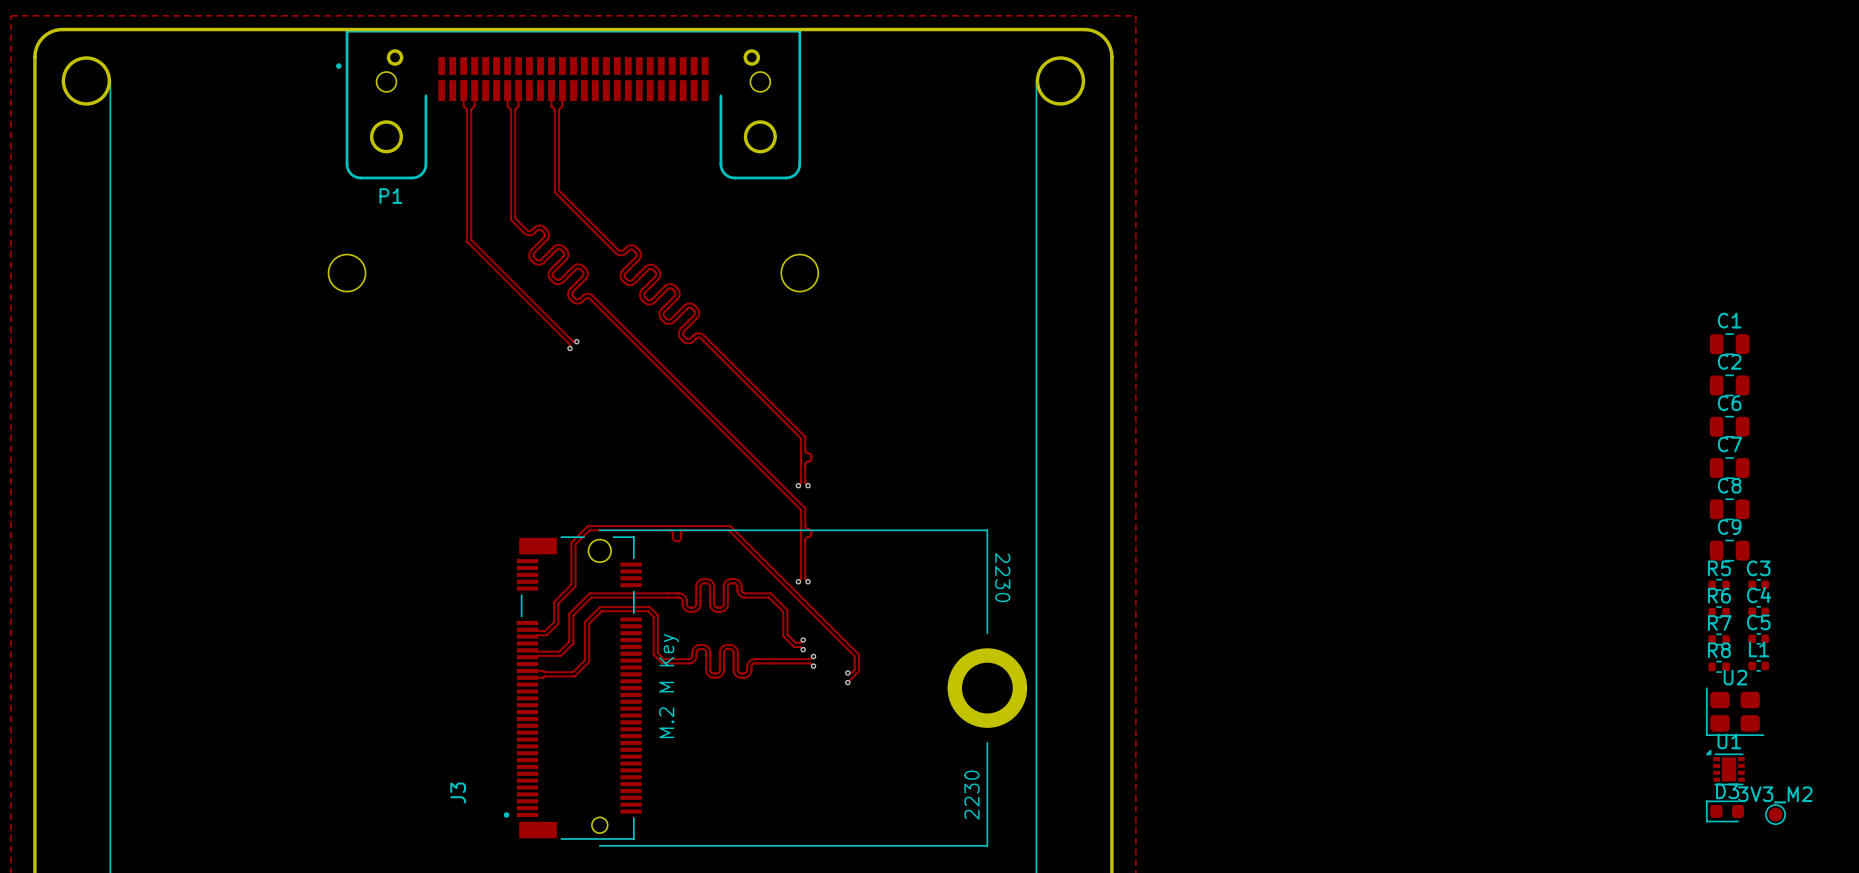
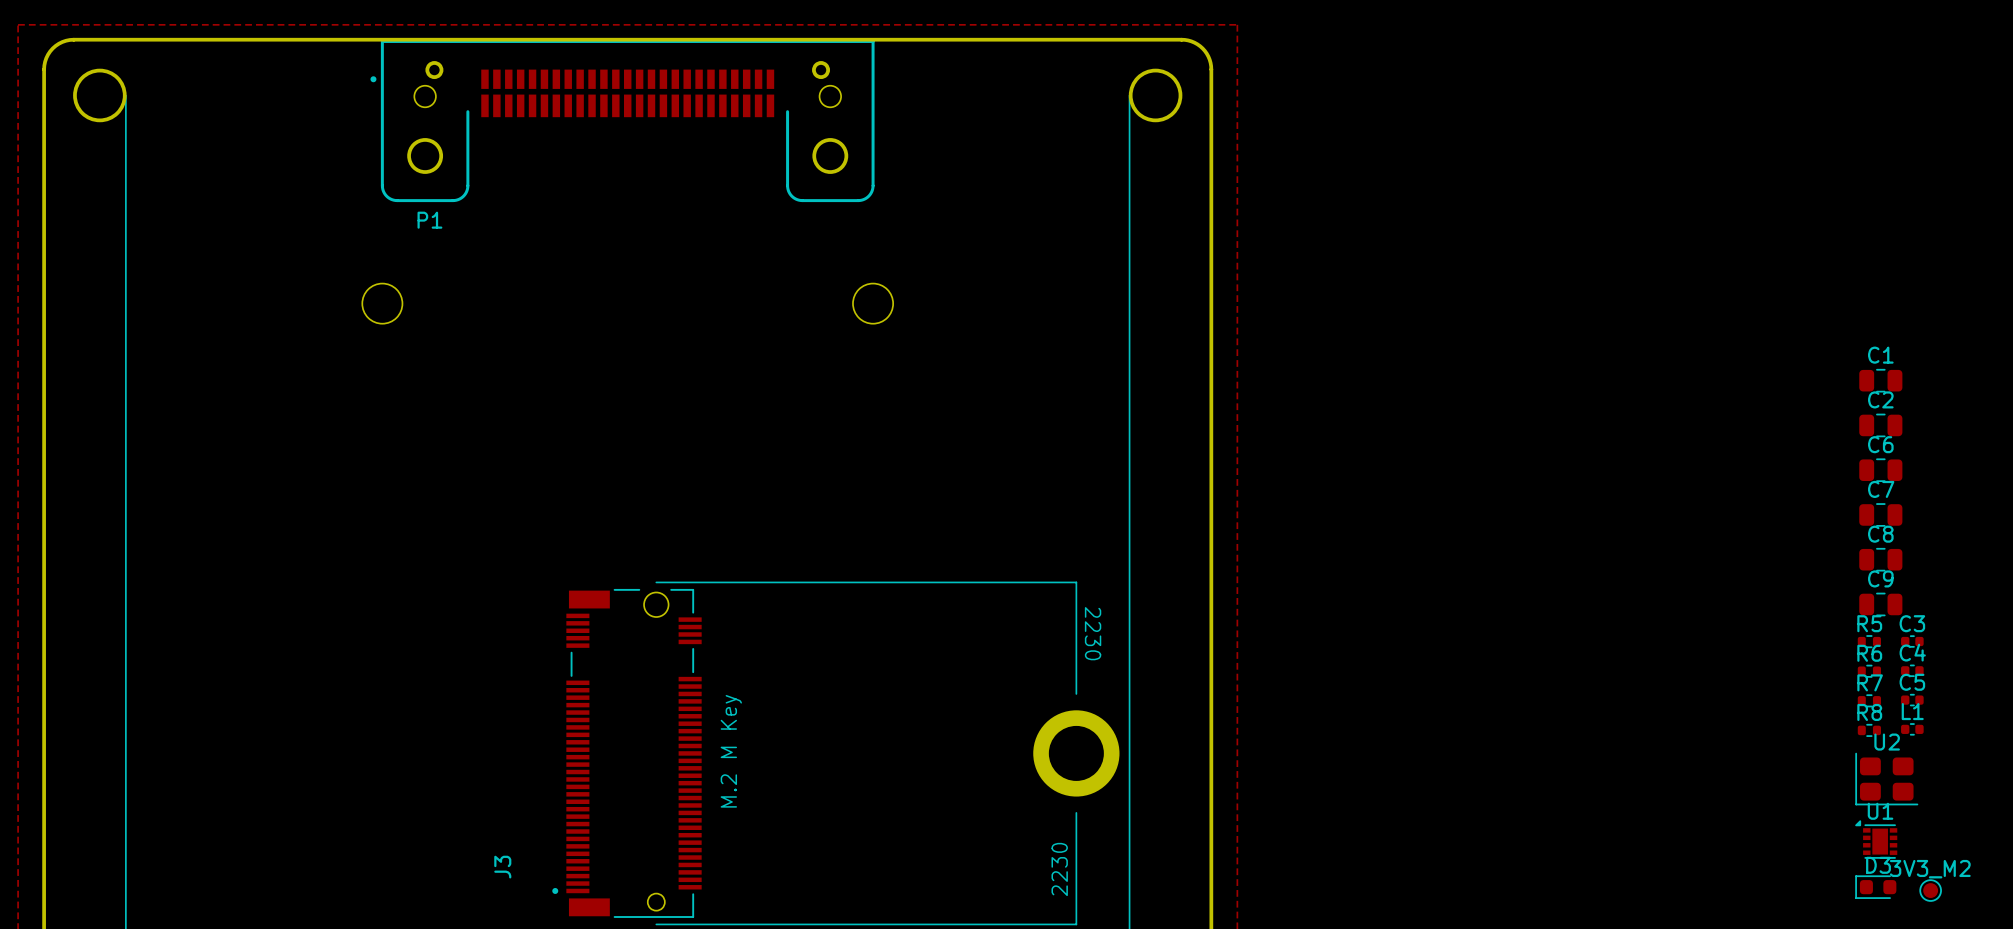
track: (463, 90) (463, 106) (467, 109) (467, 241) (570, 344) (570, 348) -> none
track: (474, 90) (474, 106) (471, 109) (471, 239) (572, 341) (576, 341) -> none
track: (507, 90) (507, 106) (510, 109) (510, 219) (526, 234) (532, 234) (539, 229) (544, 234) (530, 251) (530, 259) (535, 264) (541, 264) (556, 249) (561, 250) (564, 255) (549, 271) (550, 280) (555, 283) (560, 283) (576, 269) (580, 269) (583, 275) (568, 290) (570, 299) (577, 303) (586, 298) (590, 299) (801, 510) (801, 579) (798, 581) -> none
track: (518, 90) (518, 106) (515, 109) (515, 218) (528, 230) (540, 225) (544, 227) (548, 234) (547, 239) (533, 253) (533, 257) (539, 260) (555, 245) (559, 245) (564, 247) (568, 251) (568, 256) (553, 272) (553, 277) (559, 279) (574, 265) (579, 264) (583, 266) (587, 271) (587, 276) (572, 292) (573, 296) (577, 299) (585, 294) (593, 296) (805, 508) (805, 526) (811, 532) (810, 536) (805, 539) (805, 579) (808, 581) -> none
track: (551, 90) (551, 106) (554, 109) (554, 192) (616, 253) (623, 255) (631, 249) (636, 252) (636, 256) (620, 273) (621, 278) (625, 283) (634, 283) (649, 269) (655, 272) (655, 276) (640, 292) (640, 298) (644, 302) (653, 303) (669, 288) (674, 291) (674, 295) (660, 311) (660, 319) (665, 323) (671, 323) (687, 308) (691, 308) (694, 314) (679, 329) (680, 338) (688, 343) (697, 337) (700, 338) (801, 438) (801, 482) (798, 485) -> none
track: (562, 90) (562, 106) (559, 109) (559, 190) (618, 250) (622, 250) (631, 245) (639, 250) (639, 258) (624, 274) (627, 280) (632, 280) (647, 265) (653, 265) (658, 269) (659, 278) (644, 293) (647, 299) (651, 299) (667, 284) (673, 284) (678, 289) (678, 297) (663, 313) (666, 319) (670, 319) (686, 304) (692, 304) (697, 308) (698, 316) (683, 331) (683, 335) (688, 339) (696, 333) (703, 334) (805, 436) (805, 451) (811, 456) (810, 460) (805, 464) (805, 482) (808, 485) -> none
via: (576, 341) -> none
via: (570, 348) -> none
via: (798, 485) -> none
via: (808, 485) -> none
via: (798, 581) -> none
via: (808, 581) -> none
track: (527, 629) (545, 631) (554, 622) (554, 601) (571, 584) (571, 542) (587, 526) (730, 526) (858, 654) (858, 671) (847, 682) -> none
track: (527, 636) (546, 635) (558, 623) (558, 603) (575, 586) (575, 544) (589, 530) (669, 530) (672, 532) (673, 539) (676, 541) (680, 539) (681, 532) (683, 530) (728, 530) (854, 656) (854, 669) (851, 672) (847, 672) -> none
track: (803, 640) (800, 642) (795, 642) (787, 634) (787, 610) (770, 593) (743, 593) (739, 581) (729, 579) (723, 585) (723, 605) (716, 607) (714, 604) (713, 583) (709, 579) (703, 579) (696, 584) (696, 604) (693, 607) (687, 606) (685, 596) (680, 593) (589, 593) (569, 613) (569, 641) (559, 651) (527, 650) -> none
via: (803, 640) -> none
track: (803, 649) (800, 646) (793, 646) (783, 636) (783, 611) (769, 597) (742, 597) (738, 593) (736, 584) (730, 583) (727, 586) (727, 607) (722, 611) (715, 611) (710, 605) (709, 585) (703, 583) (700, 586) (700, 606) (693, 611) (684, 609) (682, 599) (679, 597) (591, 597) (573, 615) (573, 643) (561, 655) (527, 657) -> none
via: (803, 649) -> none
track: (813, 656) (810, 659) (753, 659) (748, 663) (746, 672) (740, 673) (737, 670) (737, 649) (732, 645) (726, 645) (720, 650) (719, 671) (712, 673) (710, 670) (710, 650) (705, 645) (695, 646) (692, 657) (689, 659) (664, 659) (657, 652) (657, 615) (649, 607) (599, 607) (585, 622) (585, 660) (573, 672) (527, 670) -> none
via: (813, 656) -> none
track: (813, 666) (810, 663) (754, 663) (751, 665) (749, 675) (739, 677) (733, 671) (733, 651) (727, 649) (724, 652) (723, 673) (718, 677) (712, 677) (706, 672) (706, 652) (703, 649) (697, 650) (695, 659) (689, 663) (662, 663) (653, 654) (653, 616) (648, 611) (601, 611) (589, 623) (589, 661) (574, 676) (527, 677) -> none
via: (813, 666) -> none
via: (847, 672) -> none
via: (847, 682) -> none

